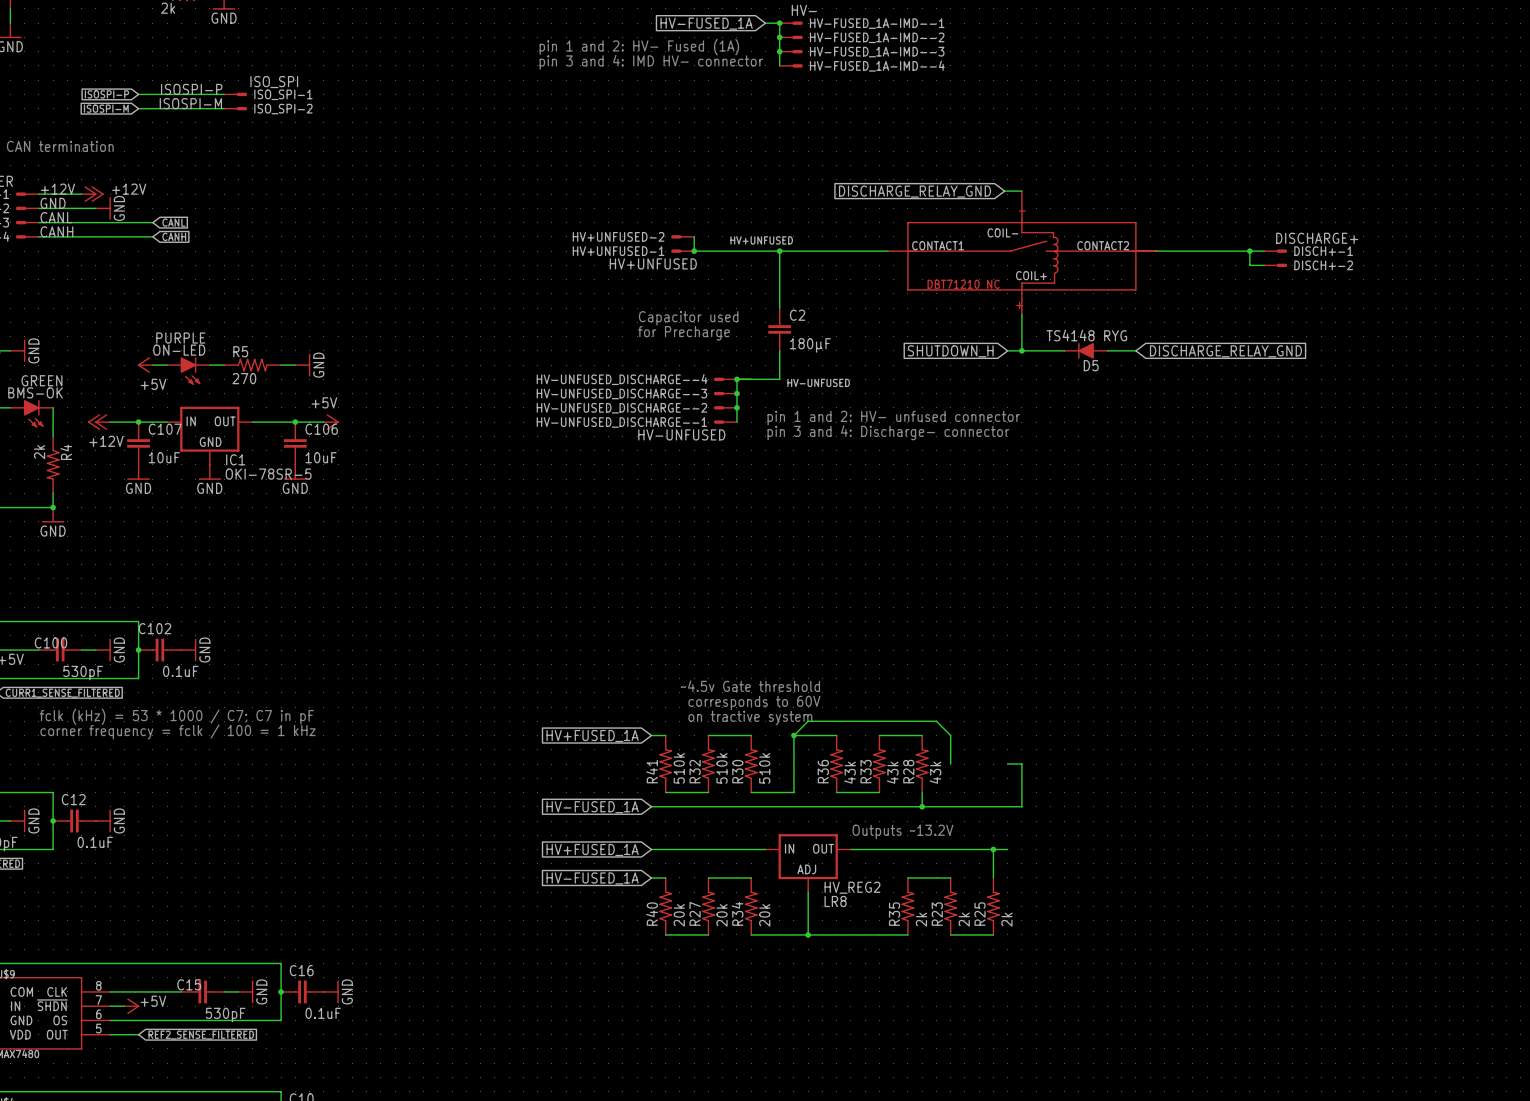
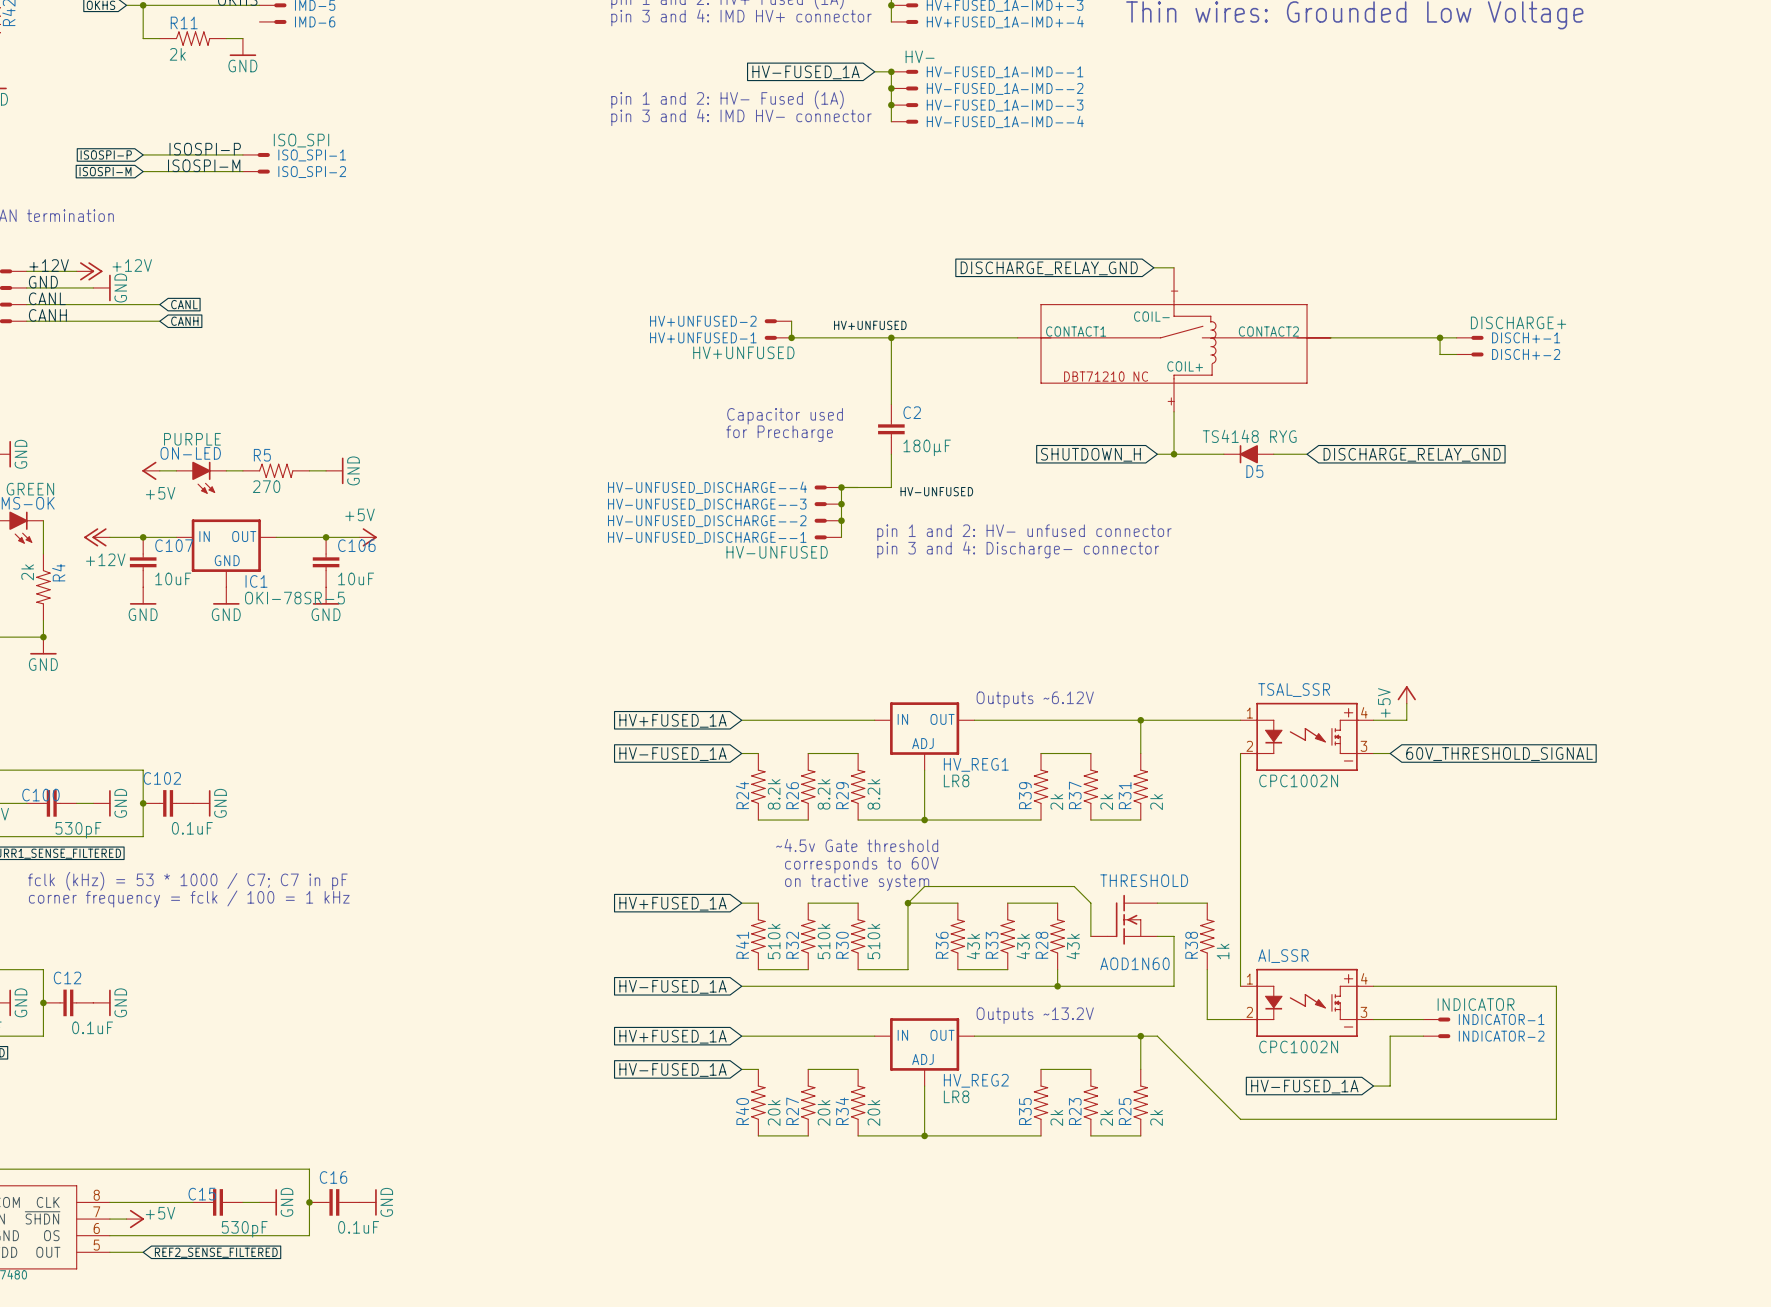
power symbol: none -> +5V (1406, 694)
text: none -> Outputs ~6.12V (1035, 699)
wire: none -> (1406, 703) (1406, 720) (1373, 720)
wire: none -> (741, 720) (874, 720)
wire: none -> (974, 720) (1240, 720)
wire: none -> (1140, 720) (1140, 753)
junction: none -> (1140, 720)
global label: none -> HV+FUSED_1A (673, 720)
HV_REG1: none -> LR8 (924, 736)
TSAL_SSR: none -> CPC1002N (1307, 736)
global label: none -> HV-FUSED_1A (673, 754)
wire: none -> (741, 753) (758, 753)
wire: none -> (808, 753) (858, 753)
wire: none -> (1041, 753) (1090, 753)
wire: none -> (1240, 753) (1240, 986)
wire: none -> (1373, 753) (1390, 753)
global label: none -> 60V_THRESHOLD_SIGNAL (1499, 754)
wire: none -> (924, 770) (924, 820)
R24: none -> 8.2k (758, 786)
R26: none -> 8.2k (808, 786)
R29: none -> 8.2k (858, 786)
R39: none -> 2k (1041, 786)
R37: none -> 2k (1090, 786)
R31: none -> 2k (1140, 786)
wire: none -> (758, 820) (808, 820)
wire: none -> (858, 820) (1041, 820)
junction: none -> (924, 820)
wire: none -> (1090, 820) (1140, 820)
wire: none -> (1157, 903) (1207, 903)
THRESHOLD: none -> AOD1N60 (1124, 919)
R38: none -> 1k (1207, 936)
wire: none -> (1207, 969) (1207, 1019) (1240, 1019)
wire: none -> (1373, 986) (1556, 986) (1556, 1119) (1240, 1119) (1157, 1036)
AI_SSR: none -> CPC1002N (1307, 1002)
wire: none -> (1373, 1019) (1423, 1019)
INDICATOR-1: none -> INDICATOR (1436, 1019)
wire: none -> (1423, 1036) (1390, 1036) (1390, 1086) (1373, 1086)
INDICATOR-2: none -> (1436, 1036)
global label: none -> HV-FUSED_1A (1304, 1086)

